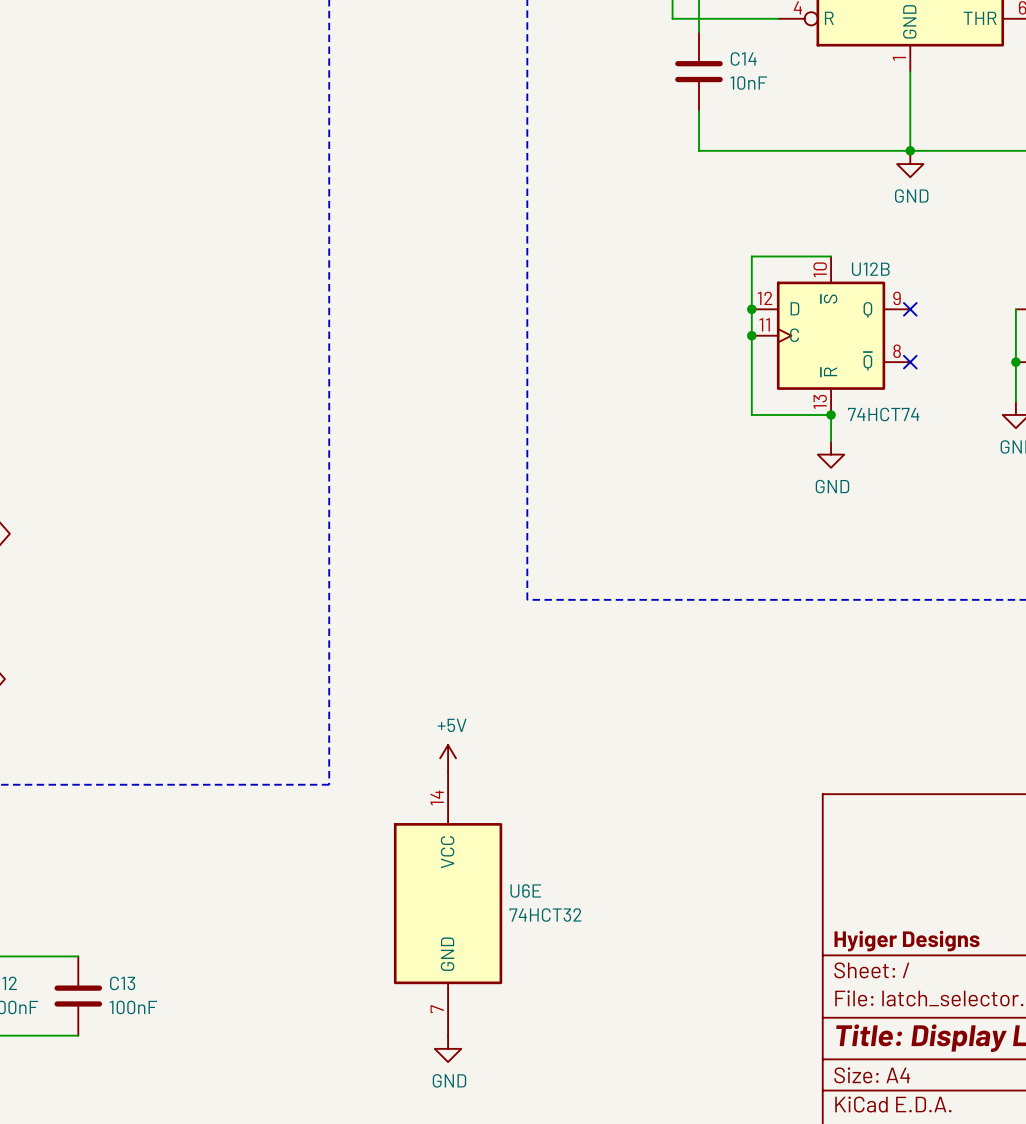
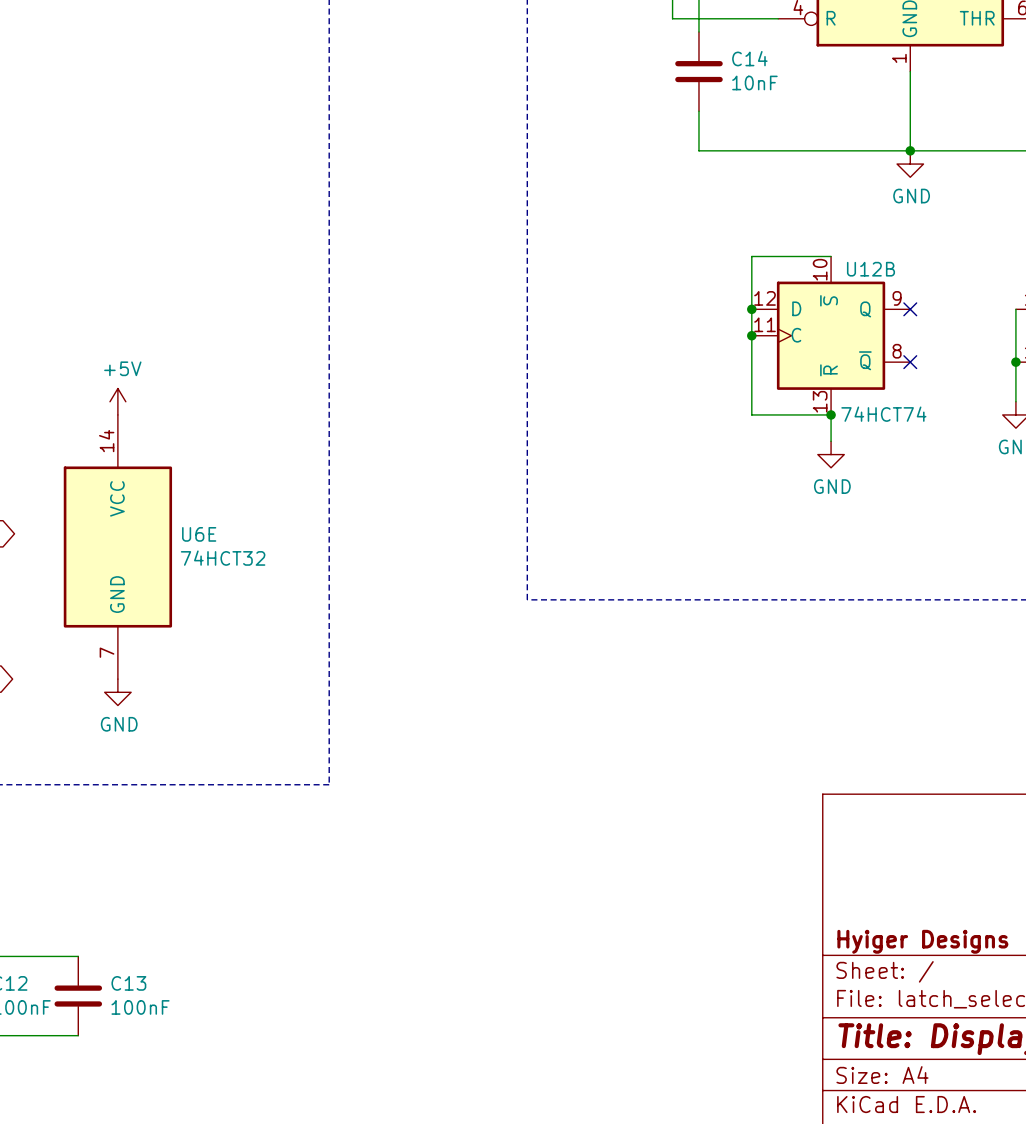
power symbol: none -> +5V (117, 401)
power symbol: none -> GND (117, 692)
power symbol: +5V (448, 758) -> none
U6E position: (448, 903) -> (117, 547)
power symbol: GND (448, 1048) -> none

